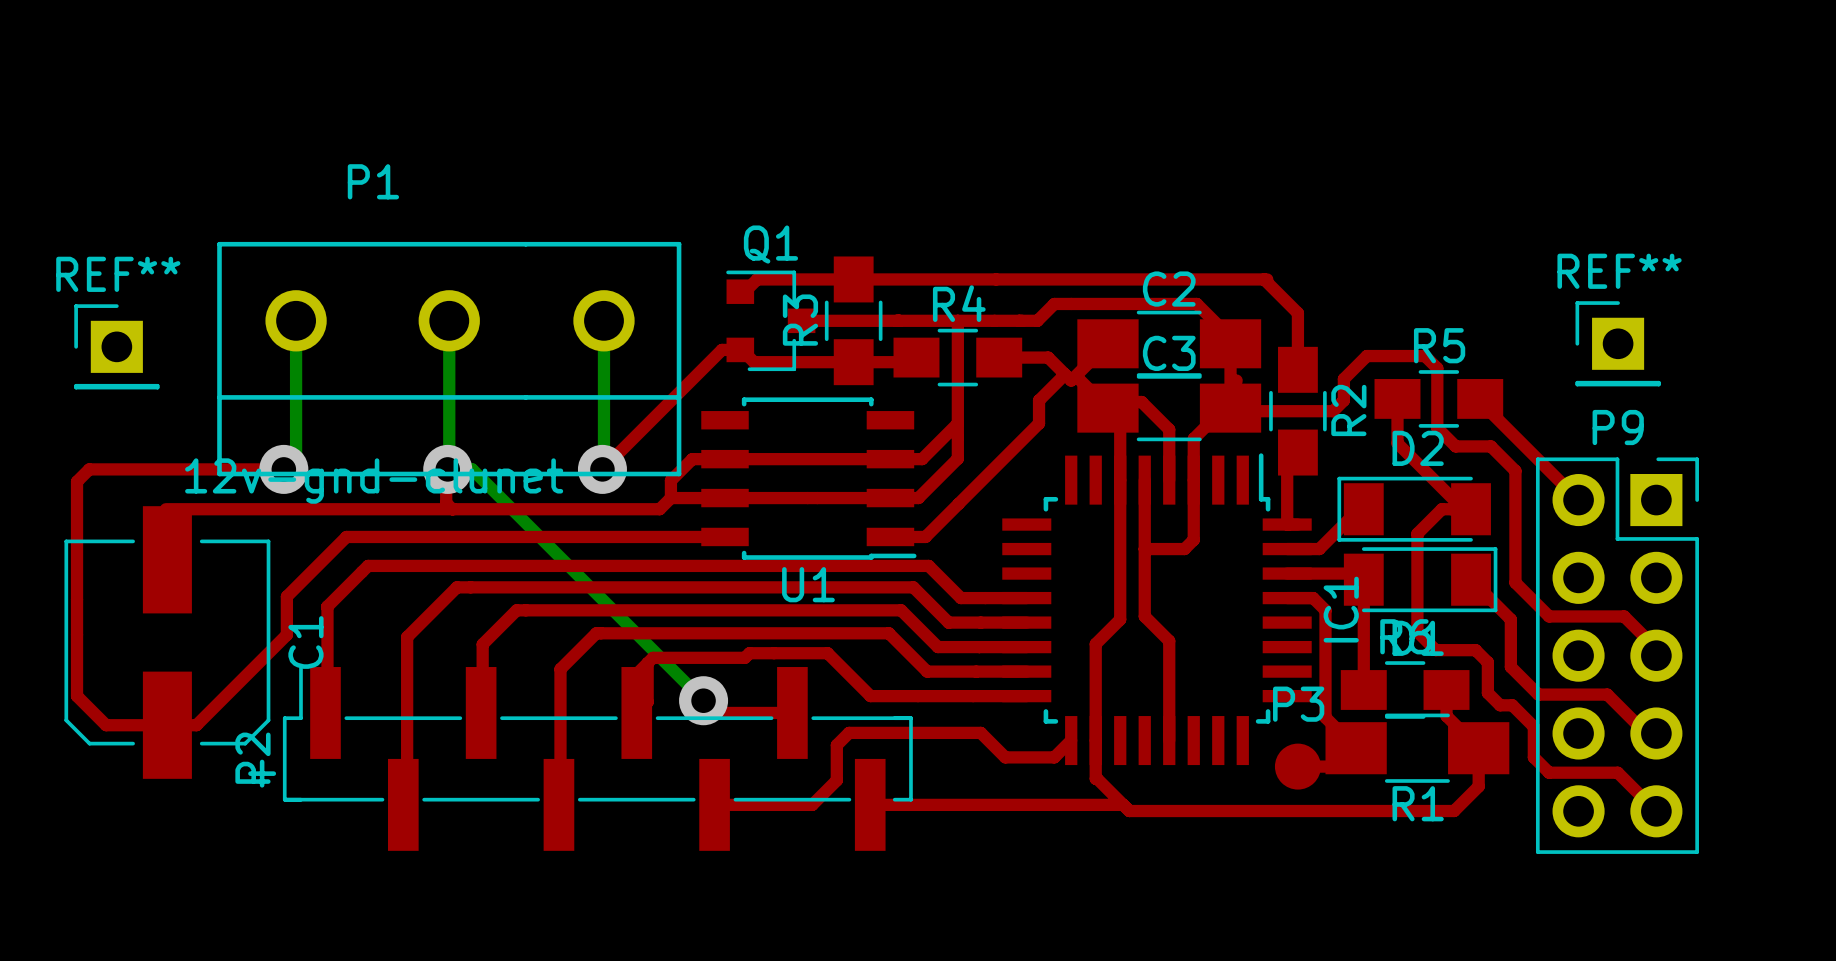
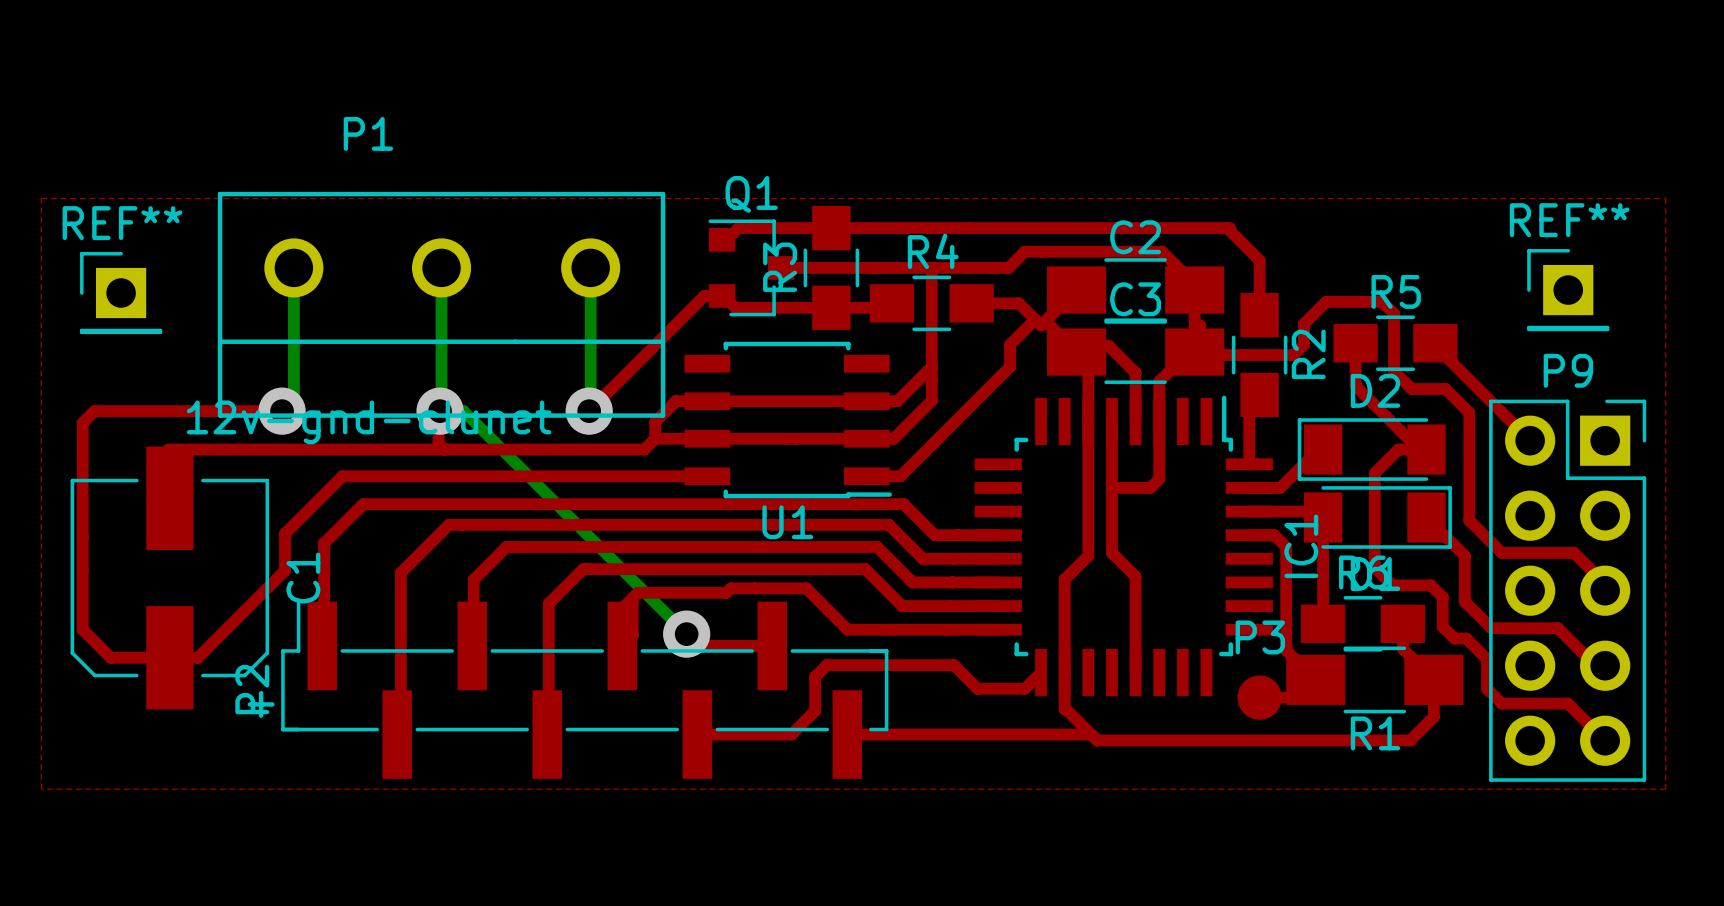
top zone outline: none -> (41, 198) (41, 789) (1665, 789) (1665, 198) (41, 198)

